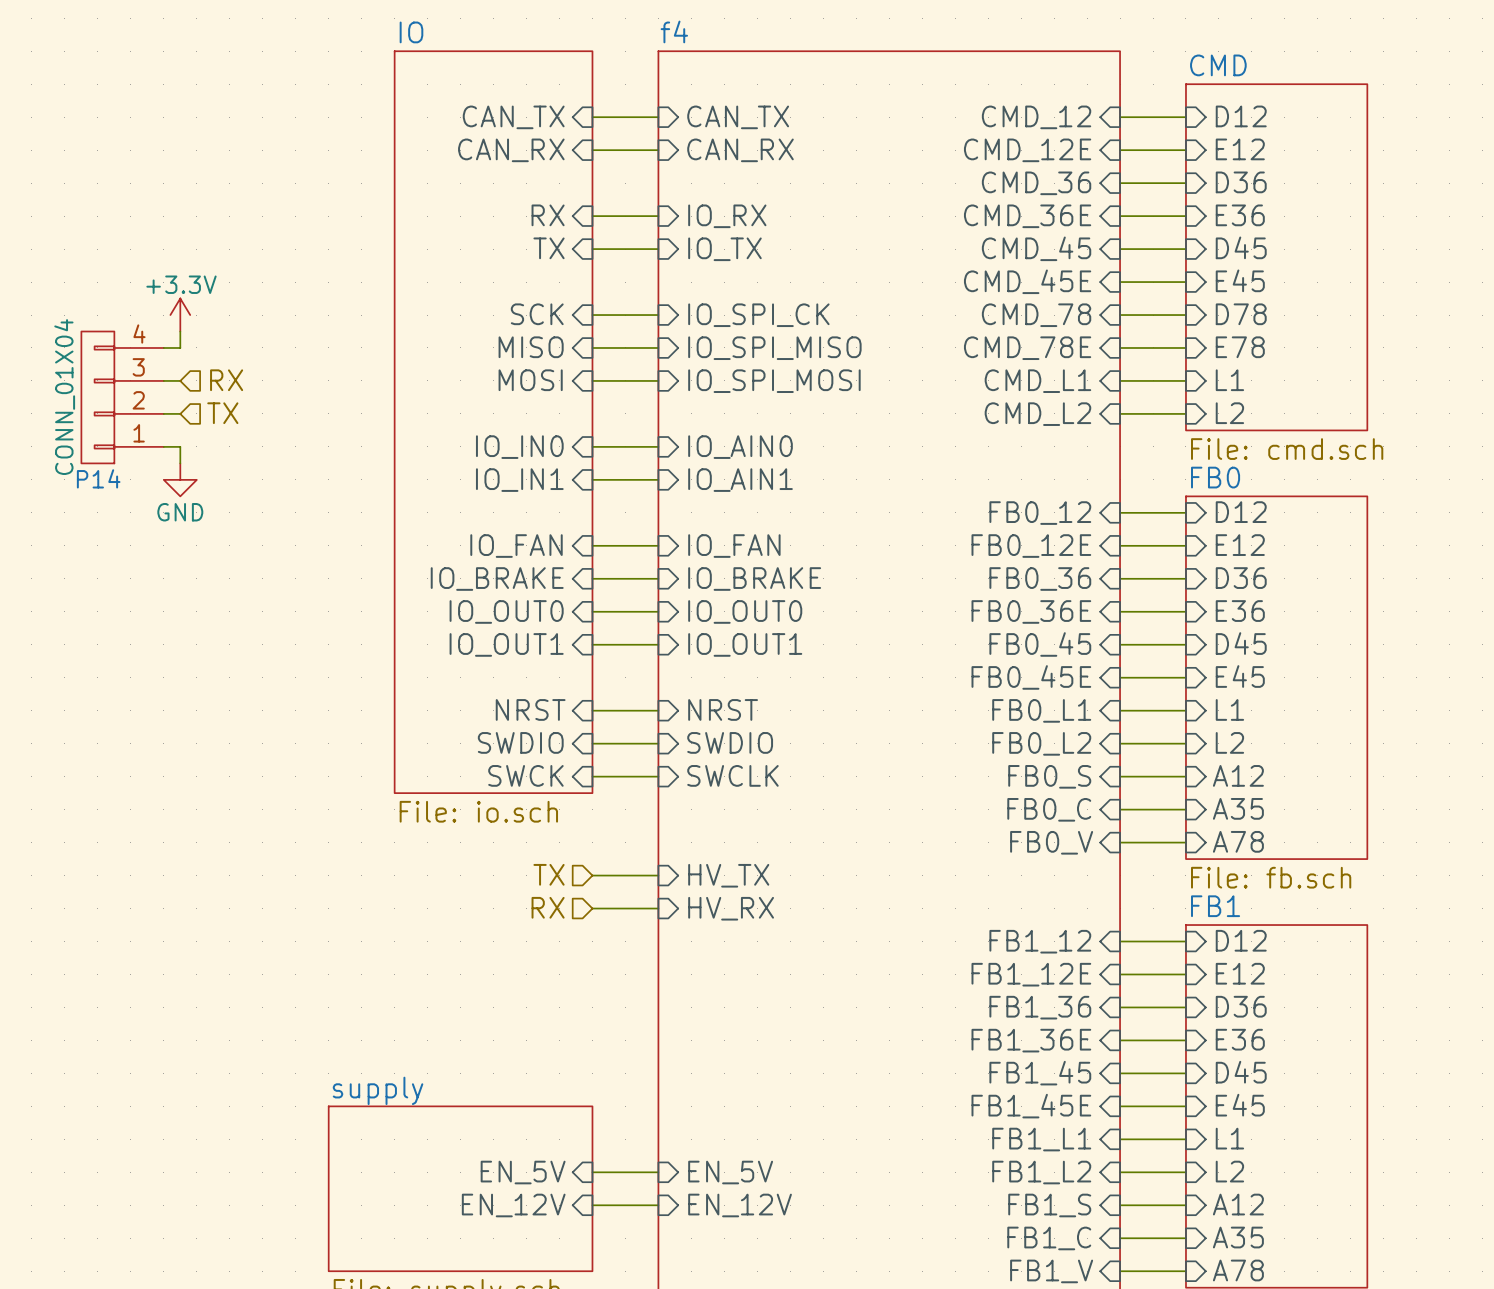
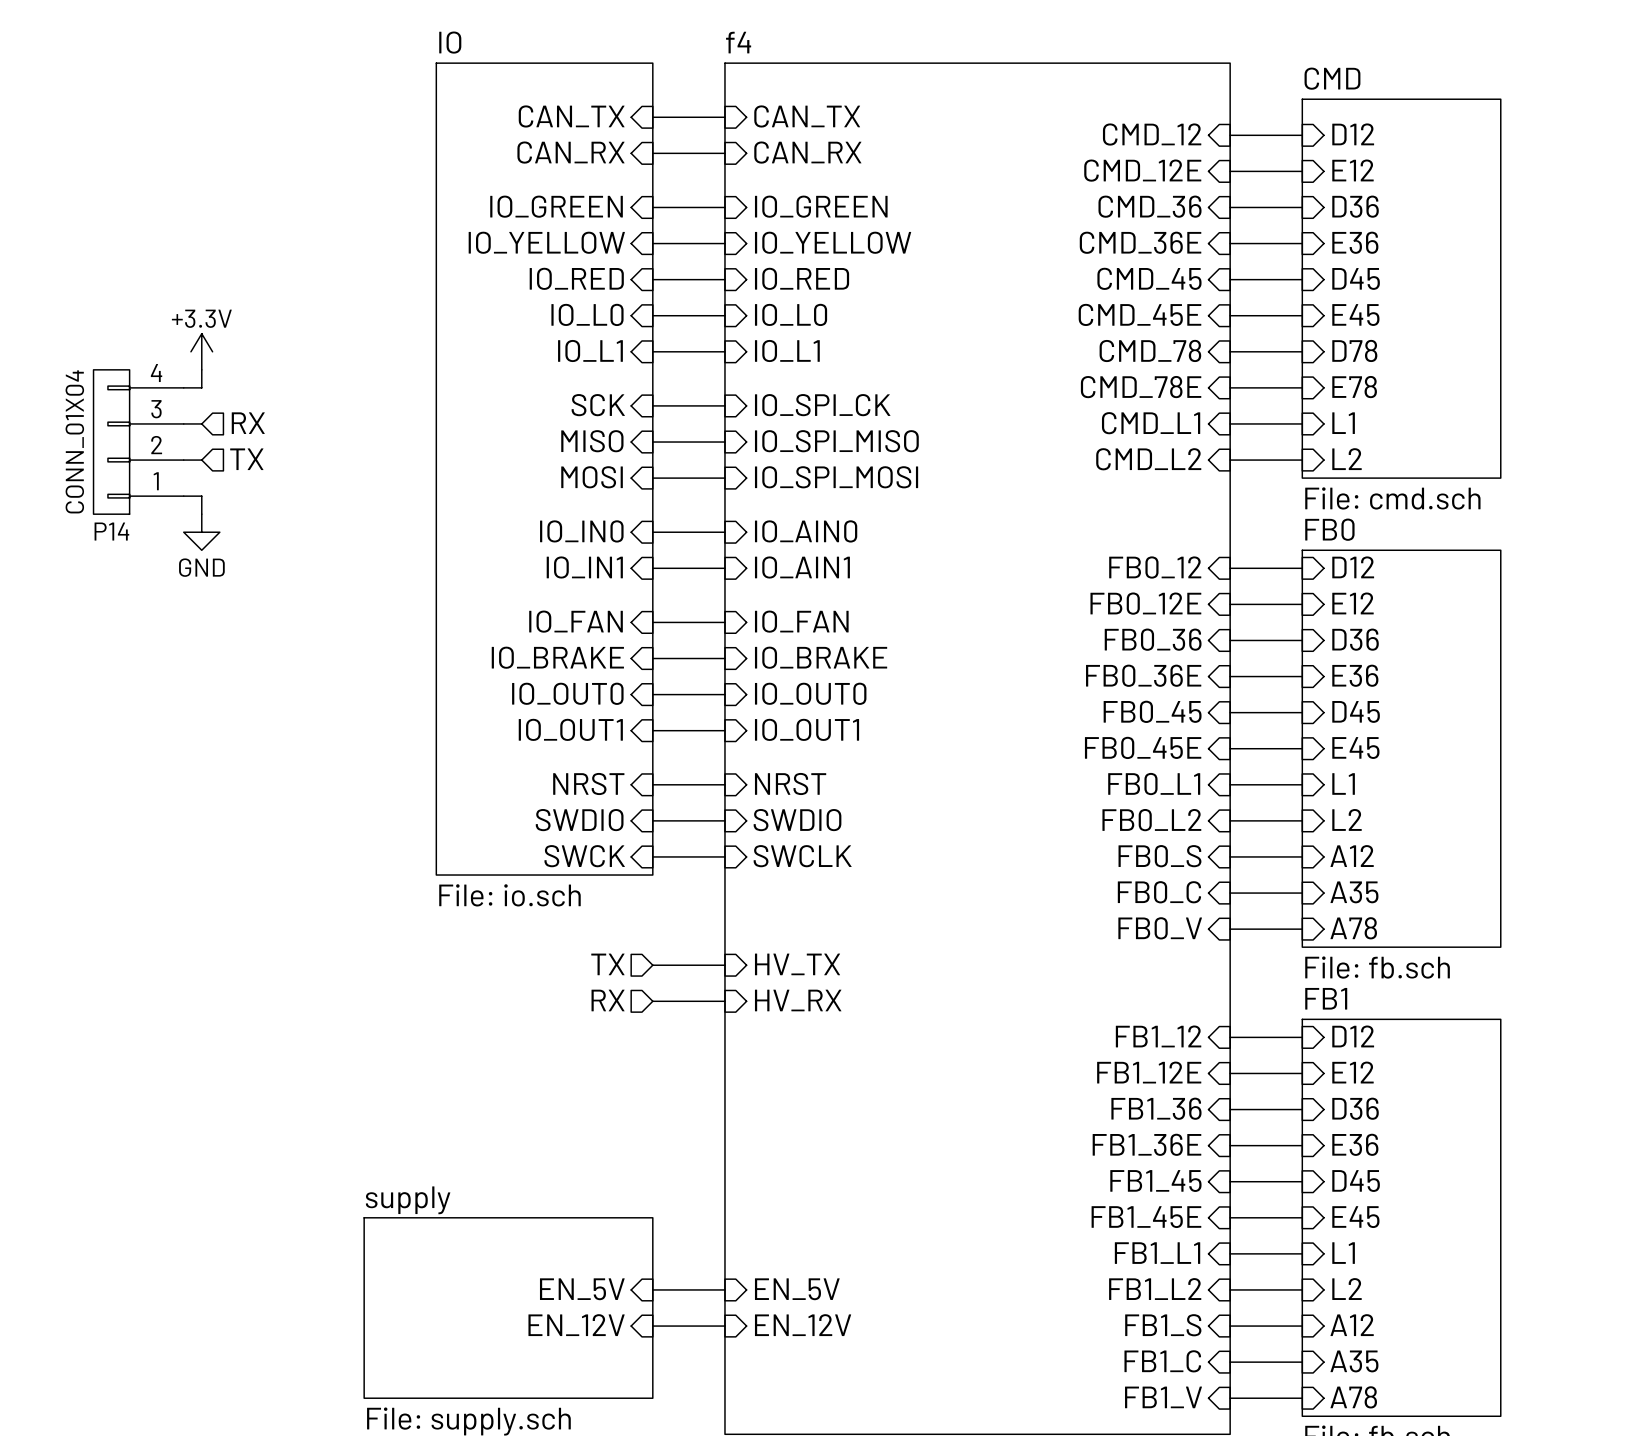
sheet pin position: CAN_TX (513, 117) -> CAN_TX (571, 116)
wire: (592, 117) (658, 117) -> (652, 117) (724, 117)
sheet pin position: CAN_TX (738, 117) -> CAN_TX (807, 116)
sheet pin position: CAN_RX (511, 150) -> CAN_RX (570, 152)
wire: (592, 150) (658, 150) -> (652, 153) (724, 153)
sheet pin position: CAN_RX (740, 150) -> CAN_RX (807, 152)
sheet pin: none -> IO_GREEN (556, 206)
wire: none -> (652, 207) (724, 207)
sheet pin: none -> IO_GREEN (821, 206)
sheet pin: RX (548, 215) -> IO_YELLOW (546, 242)
sheet pin: IO_RX (727, 216) -> IO_YELLOW (833, 242)
sheet pin: TX (549, 248) -> IO_RED (576, 278)
sheet pin: IO_TX (724, 249) -> IO_RED (802, 278)
sheet pin: none -> IO_L0 (587, 314)
wire: none -> (652, 315) (724, 315)
sheet pin: none -> IO_L0 (791, 314)
sheet pin: SCK (537, 314) -> IO_L1 (590, 351)
sheet pin: IO_SPI_CK (758, 315) -> IO_L1 (787, 351)
sheet pin position: MISO (531, 347) -> MISO (592, 441)
wire: (592, 347) (658, 347) -> (652, 405) (724, 405)
sheet pin position: IO_SPI_MISO (774, 348) -> IO_SPI_MISO (836, 441)
sheet pin: none -> SCK (598, 405)
sheet pin: none -> IO_SPI_CK (822, 405)
sheet pin position: MOSI (530, 380) -> MOSI (592, 477)
wire: (592, 380) (658, 380) -> (652, 442) (724, 442)
sheet pin position: IO_SPI_MOSI (774, 381) -> IO_SPI_MOSI (836, 477)
wire: (592, 446) (658, 446) -> (652, 478) (724, 478)
sheet pin: IO_IN0 (519, 447) -> none
sheet pin: IO_AIN0 (740, 447) -> none
sheet pin: IO_IN1 (519, 480) -> IO_IN0 (581, 531)
sheet pin: IO_AIN1 (740, 480) -> IO_AIN0 (806, 531)
wire: none -> (652, 568) (724, 568)
sheet pin: none -> IO_IN1 (584, 567)
sheet pin: none -> IO_AIN1 (802, 567)
wire: (592, 545) (658, 545) -> (652, 622) (724, 622)
sheet pin position: IO_FAN (516, 546) -> IO_FAN (576, 621)
sheet pin position: IO_FAN (734, 546) -> IO_FAN (801, 621)
wire: (592, 578) (658, 578) -> (652, 658) (724, 658)
sheet pin position: IO_BRAKE (497, 579) -> IO_BRAKE (557, 657)
sheet pin position: IO_BRAKE (754, 579) -> IO_BRAKE (821, 657)
sheet pin position: IO_OUT0 (506, 611) -> IO_OUT0 (567, 693)
wire: (592, 611) (658, 611) -> (652, 694) (724, 694)
sheet pin position: IO_OUT0 (745, 611) -> IO_OUT0 (810, 693)
sheet pin position: IO_OUT1 (506, 644) -> IO_OUT1 (570, 729)
wire: (592, 644) (658, 644) -> (652, 730) (724, 730)
sheet pin position: IO_OUT1 (745, 644) -> IO_OUT1 (807, 729)

